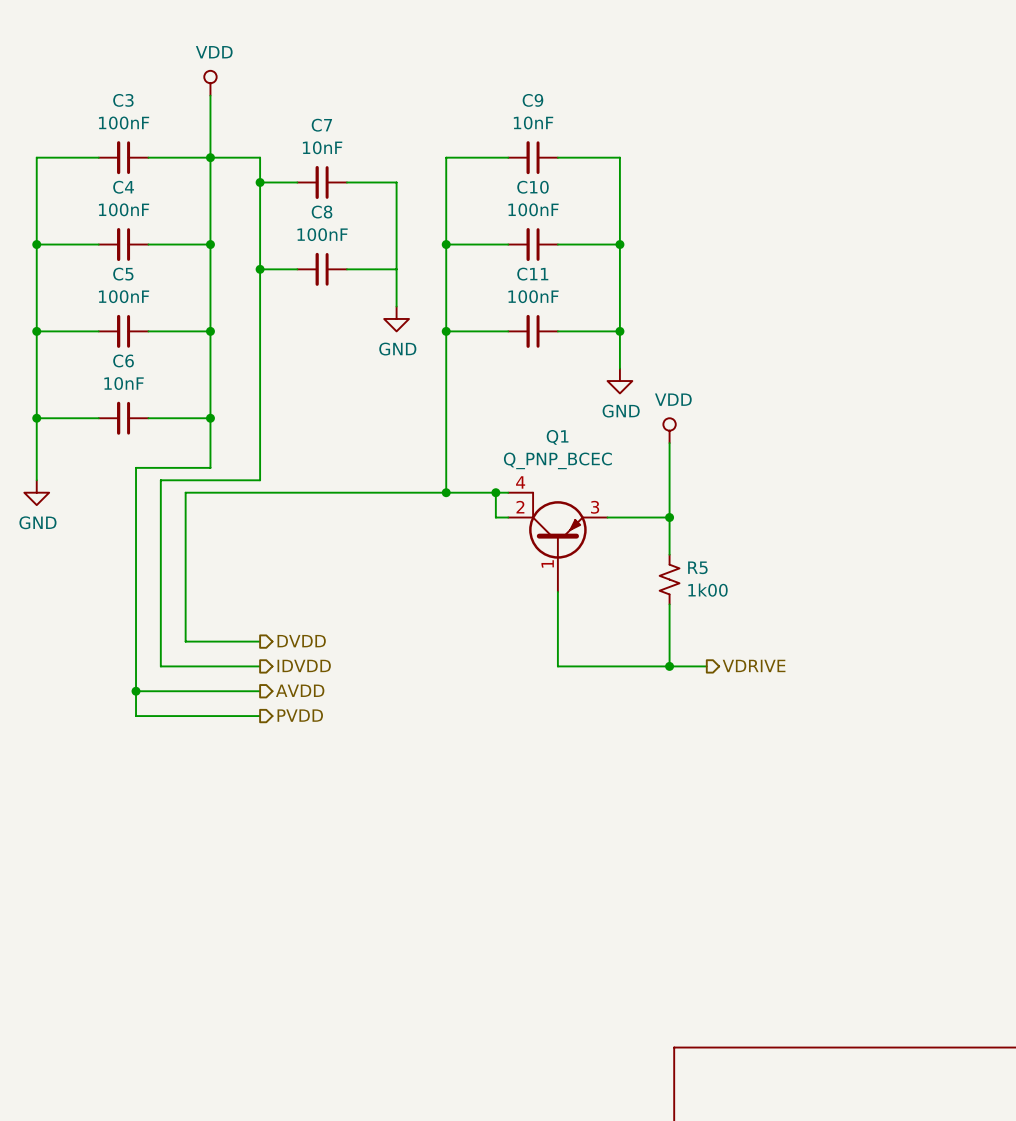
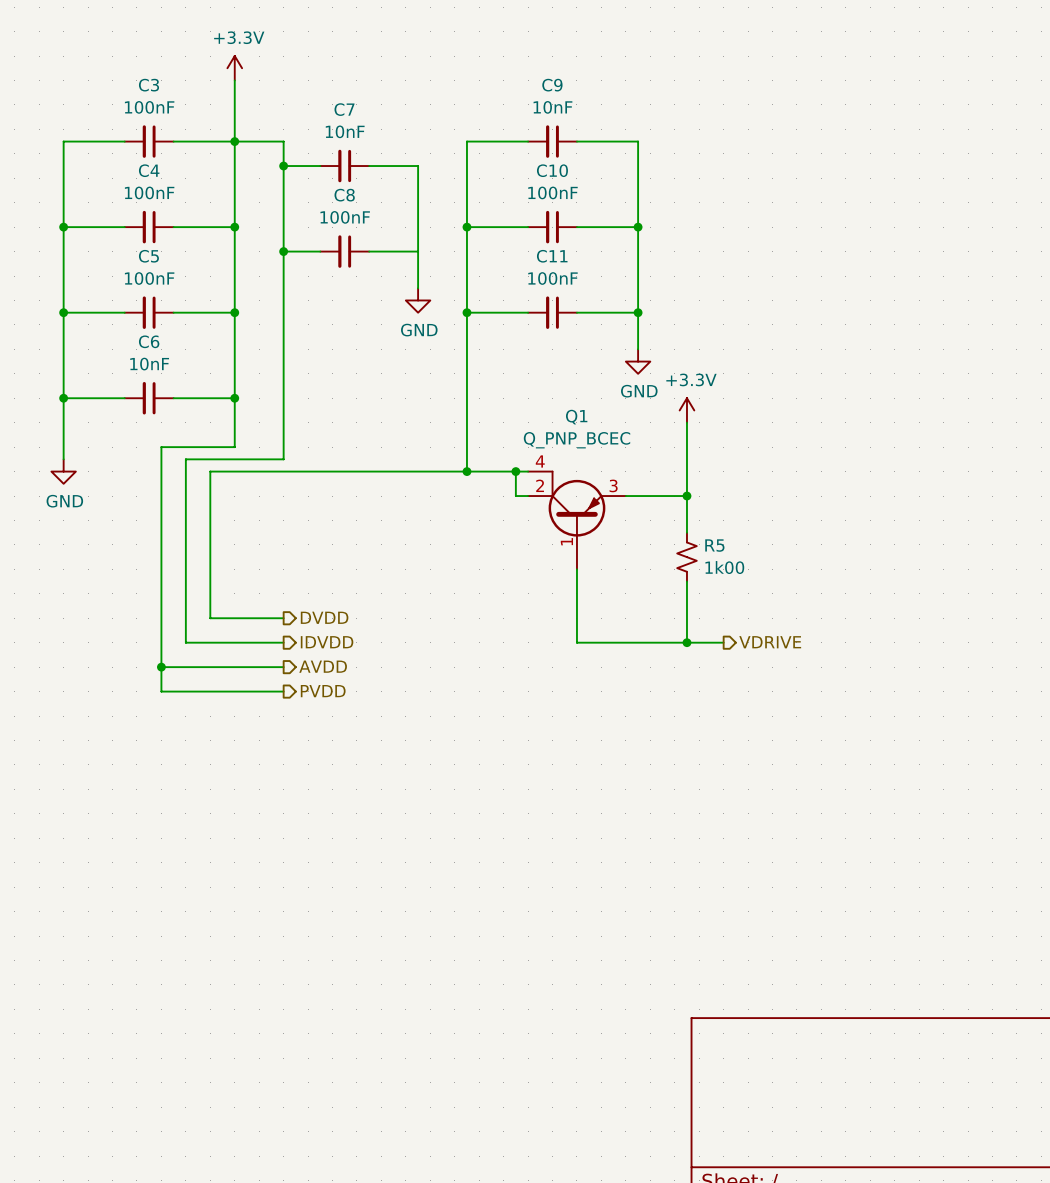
power symbol: VDD (210, 83) -> +3.3V (234, 68)
power symbol: VDD (669, 430) -> +3.3V (686, 410)

